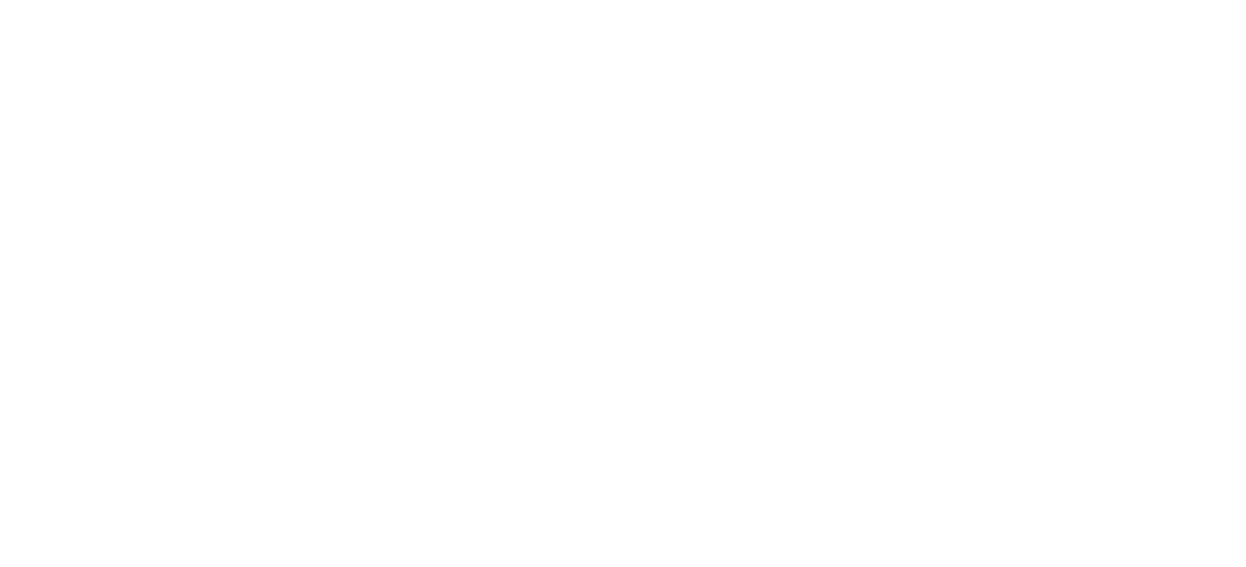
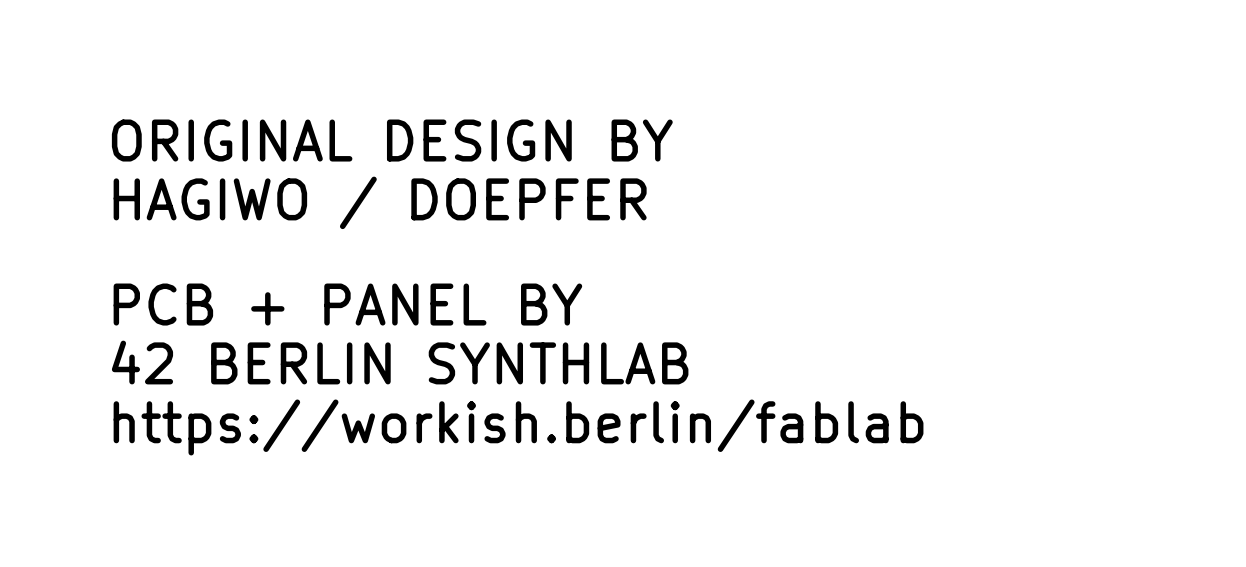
text: none -> ORIGINAL DESIGN BY (392, 140)
text: none -> HAGIWO / DOEPFER (380, 202)
text: none -> PCB + PANEL BY (347, 304)
text: none -> 42 BERLIN SYNTHLAB (400, 362)
text: none -> https://workish.berlin/fablab (518, 427)

